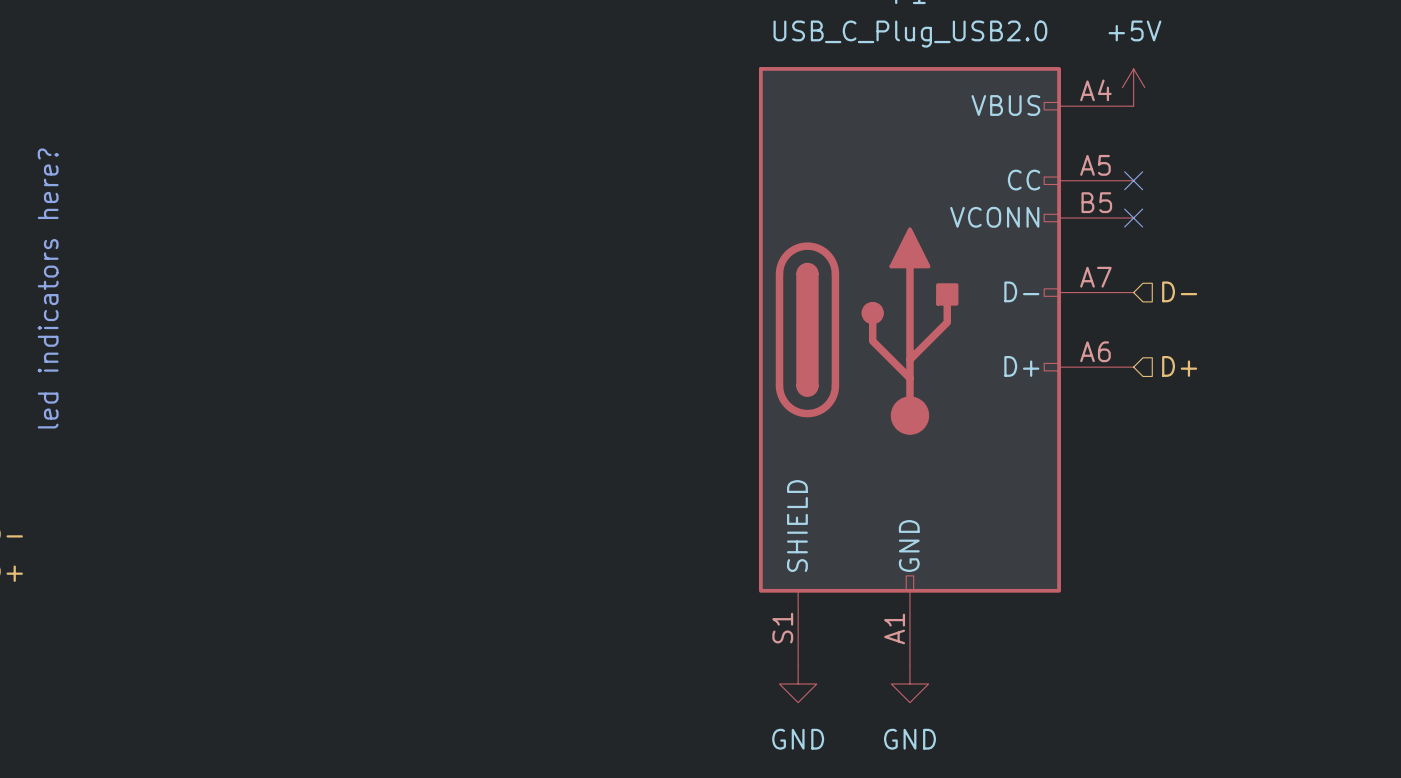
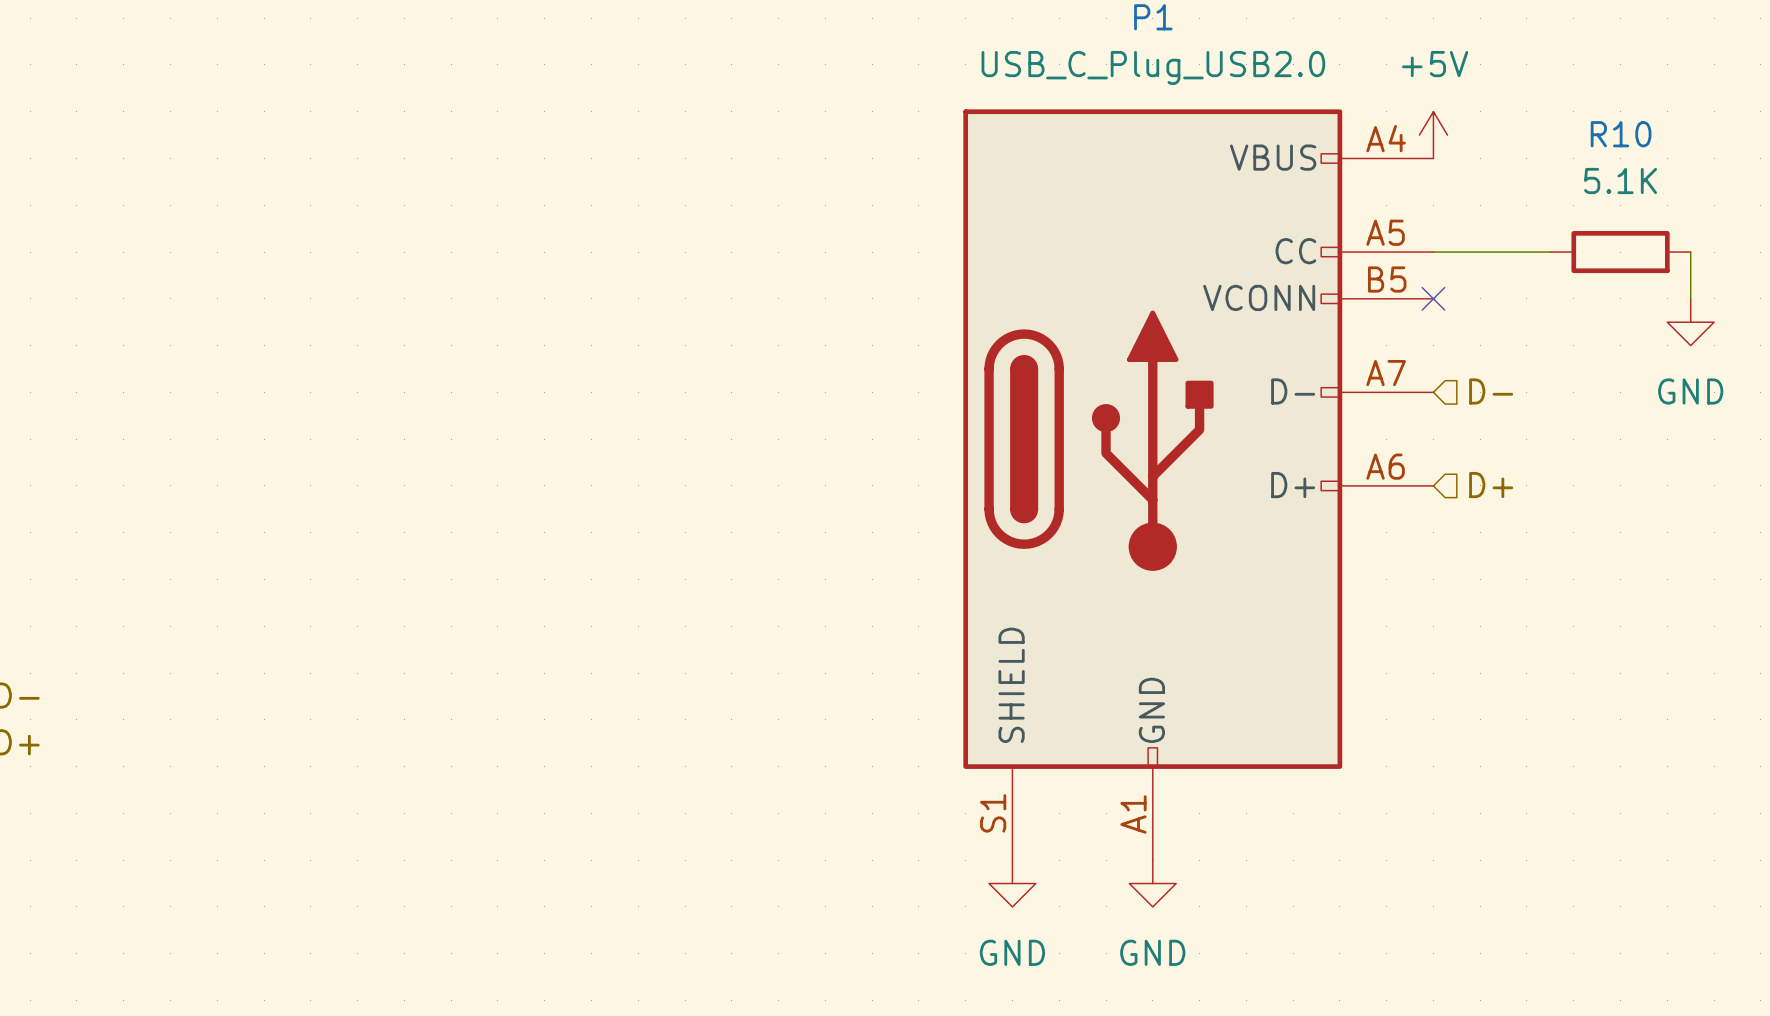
wire: none -> (1433, 252) (1550, 252)
no-connect mark: (1133, 180) -> none
R10: none -> 5.1K (1620, 252)
wire: none -> (1690, 252) (1690, 298)
power symbol: none -> GND (1690, 322)
text: led indicators here? (48, 288) -> none

